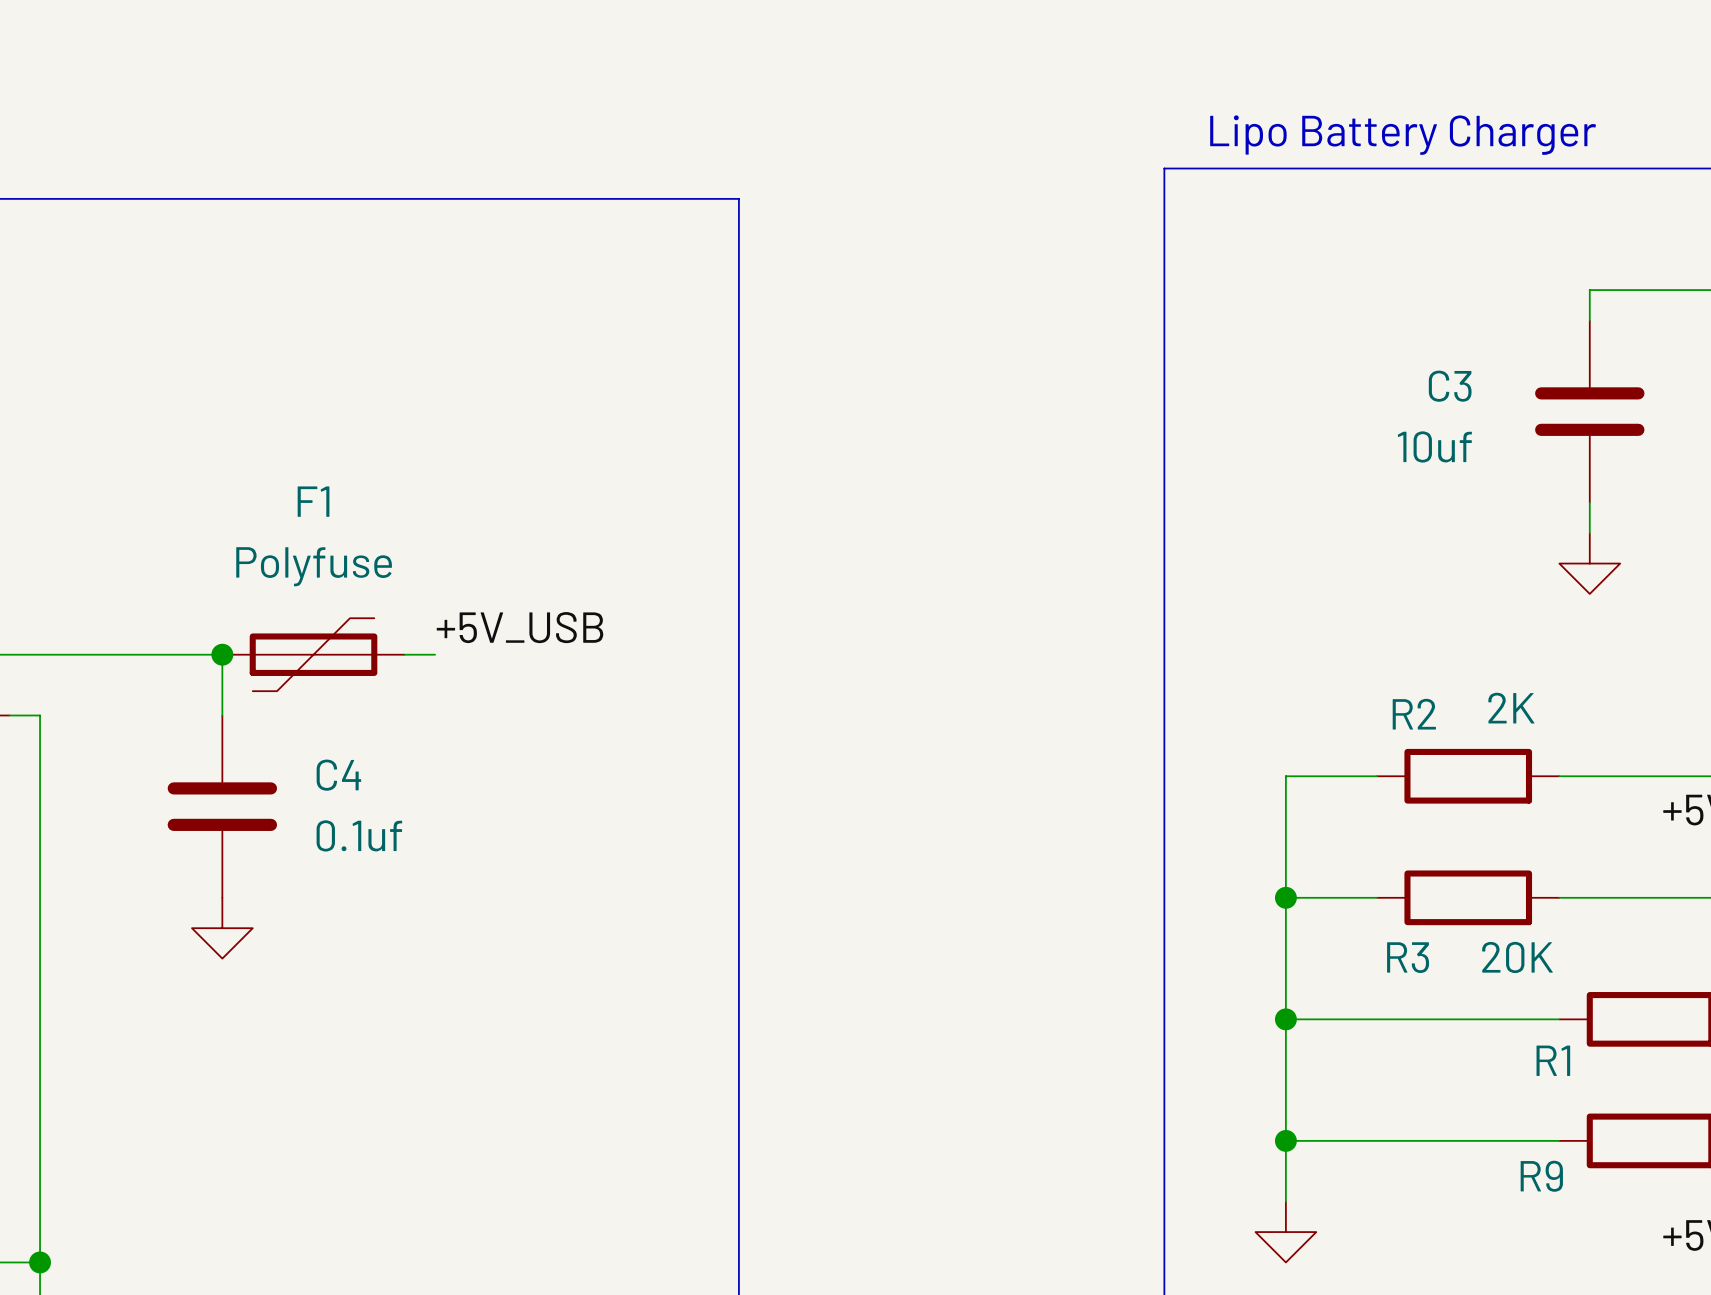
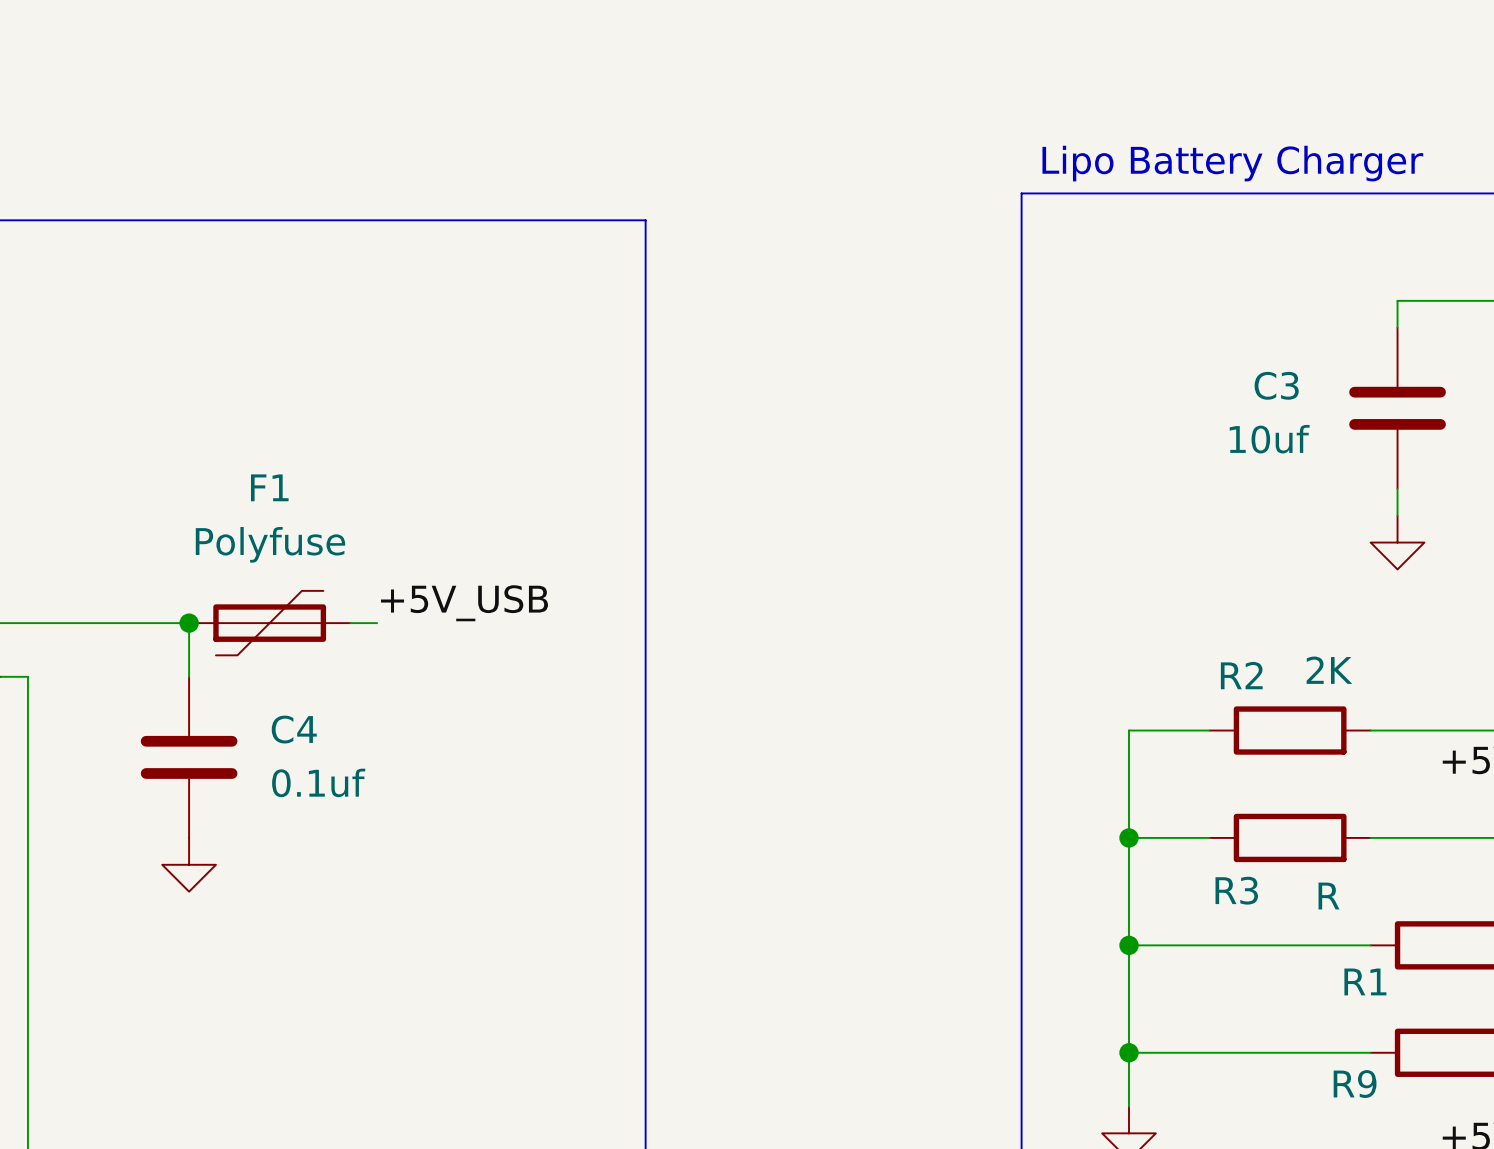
R3 value: 20K (1517, 957) -> R (1329, 896)

